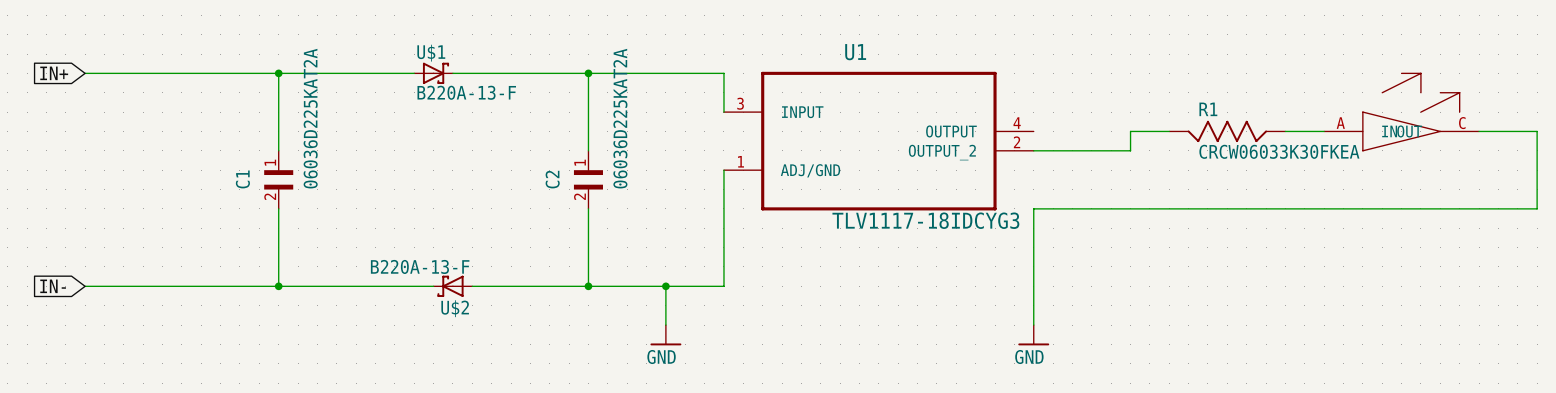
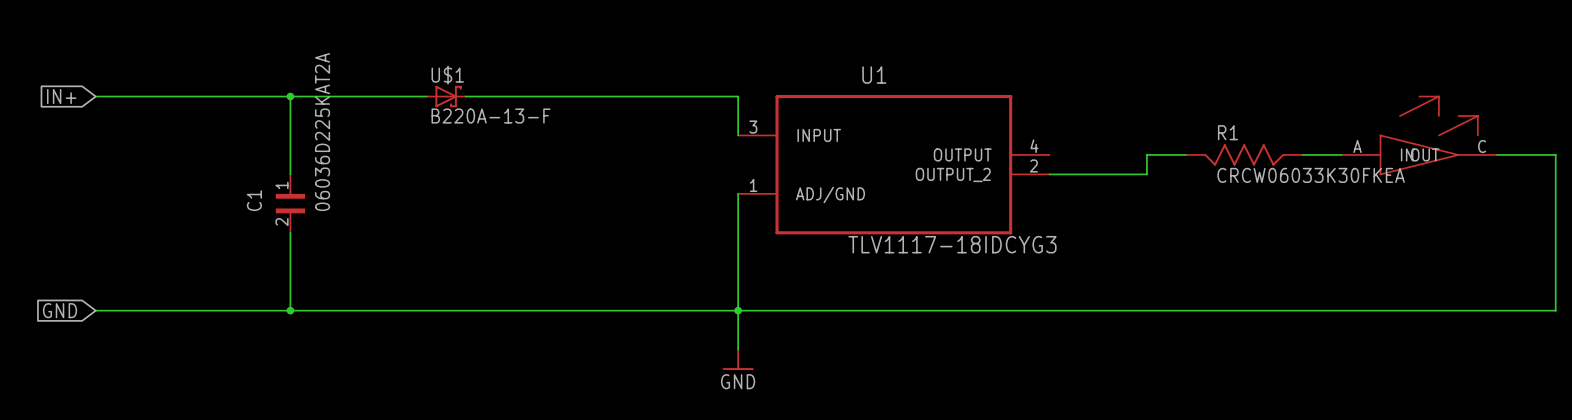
wire: (588, 73) (588, 150) -> none
junction: (588, 73) -> none
C2: 06036D225KAT2A (588, 179) -> none
wire: (588, 208) (588, 286) -> none
wire: (1537, 208) (1033, 208) (1033, 325) -> (1555, 232) (1555, 310) (738, 310) (738, 349)
global label: IN- (53, 286) -> GND (60, 310)
U$2: B220A-13-F (452, 286) -> none
junction: (588, 286) -> none
wire: (665, 286) (665, 325) -> none
junction: (665, 286) -> none
junction: none -> (738, 310)
power symbol position: GND (665, 335) -> GND (738, 359)
power symbol: GND (1033, 335) -> none

